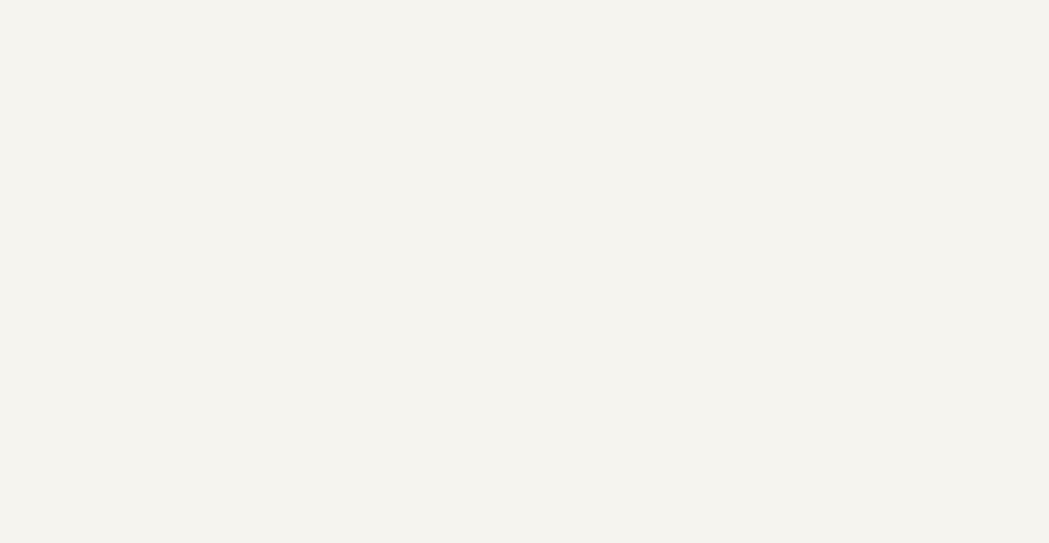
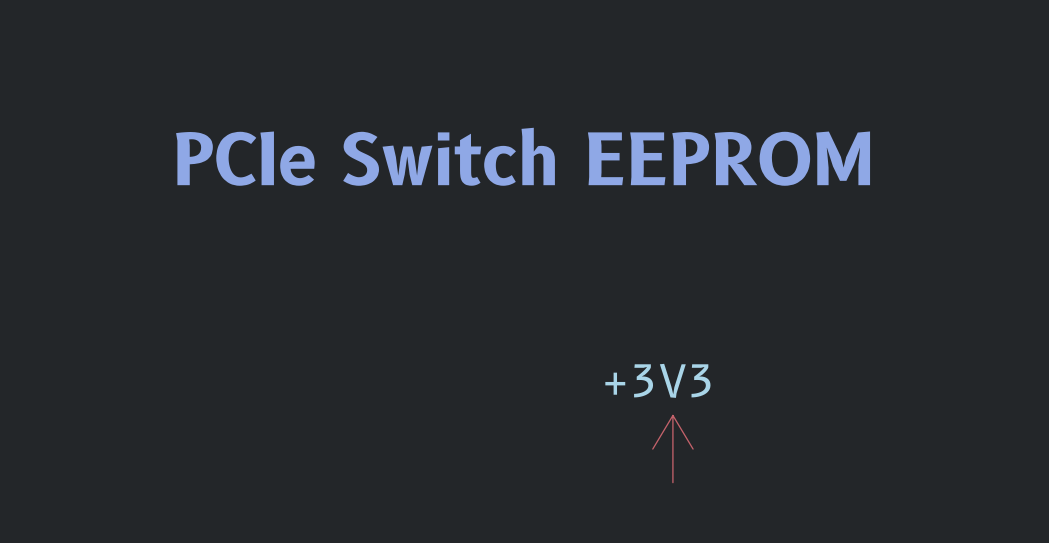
text: none -> PCIe Switch EEPROM (523, 156)
power symbol: none -> +3V3 (672, 449)

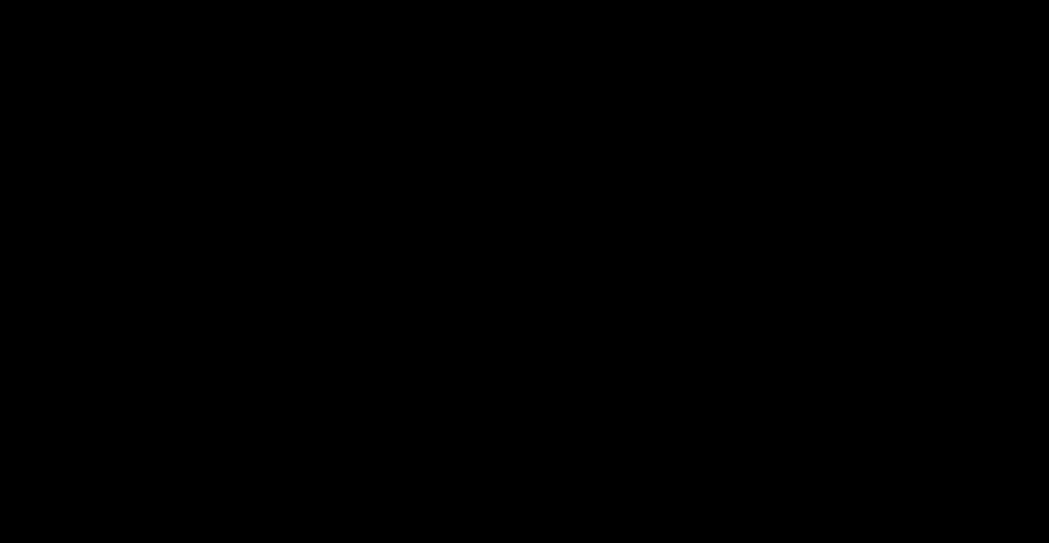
text: PCIe Switch EEPROM (523, 156) -> none
power symbol: +3V3 (672, 449) -> none

